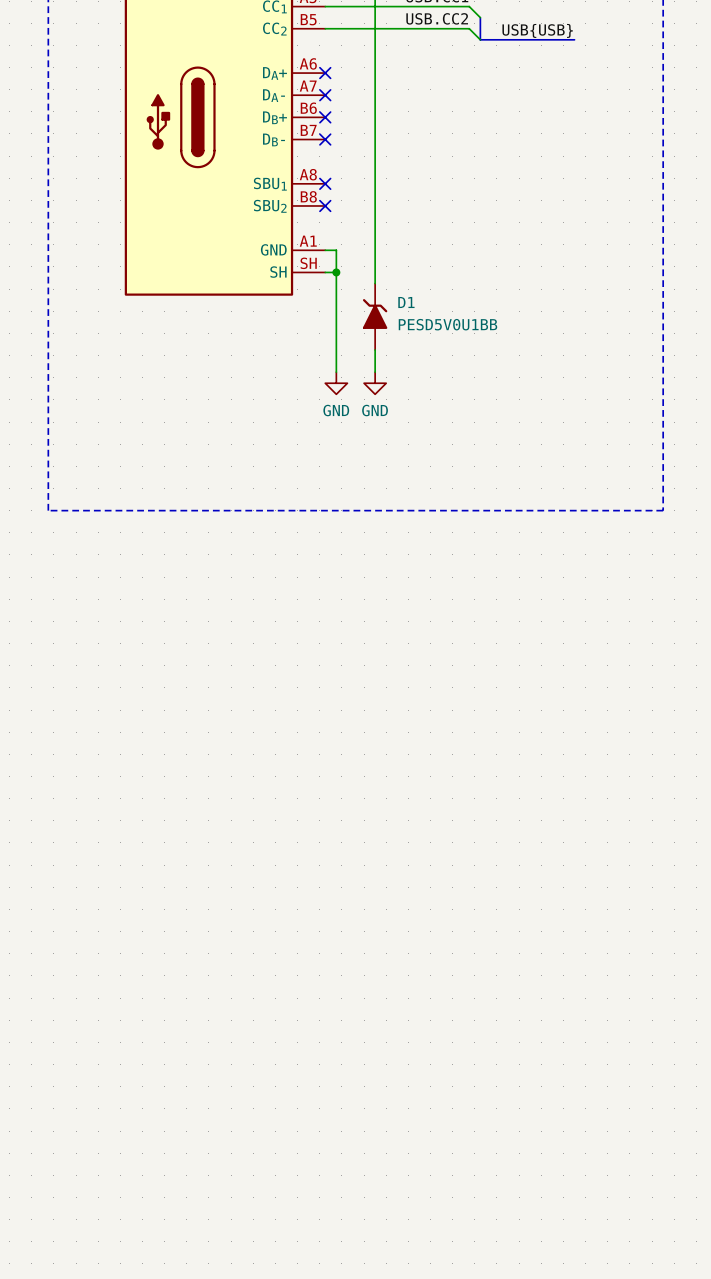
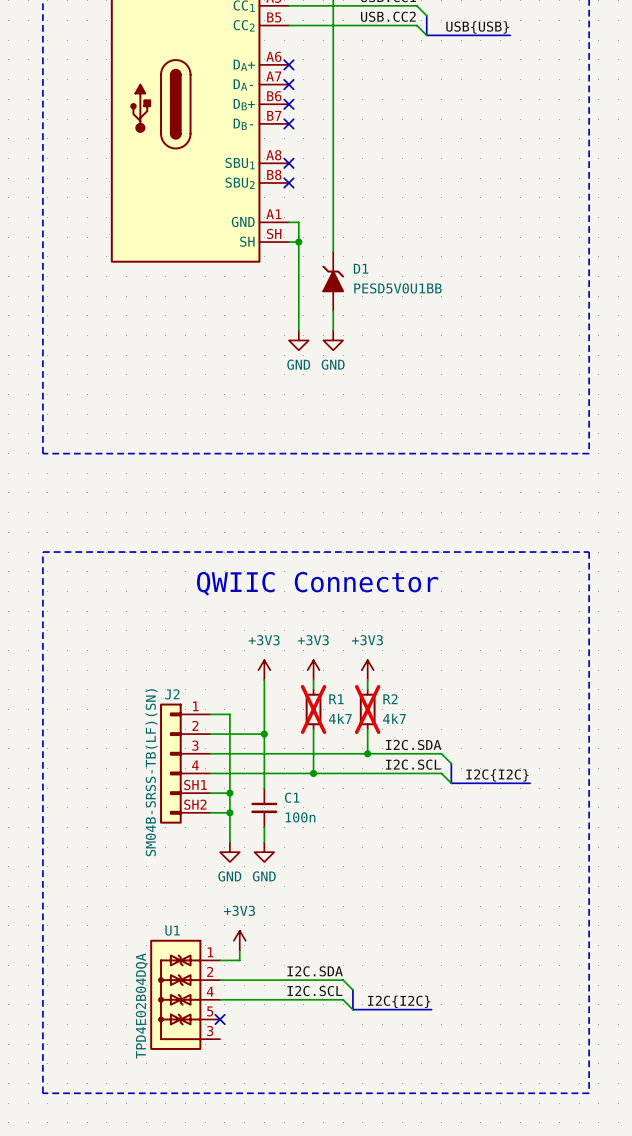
line: none -> (42, 552) (589, 552) (589, 1093) (42, 1093) (42, 552)
text: none -> QWIIC Connector (317, 583)
power symbol: none -> +3V3 (264, 670)
power symbol: none -> +3V3 (313, 670)
power symbol: none -> +3V3 (367, 670)
wire: none -> (264, 679) (264, 788)
wire: none -> (313, 679) (313, 689)
wire: none -> (367, 679) (367, 689)
R1: none -> (313, 709)
R2: none -> (367, 709)
wire: none -> (210, 714) (229, 714) (229, 842)
wire: none -> (313, 729) (313, 773)
wire: none -> (367, 729) (367, 753)
wire: none -> (210, 734) (264, 734)
junction: none -> (264, 734)
label: none -> I2C.SDA (413, 744)
wire: none -> (210, 753) (441, 753) (451, 763)
junction: none -> (367, 753)
J2: none -> (185, 763)
bus: none -> (451, 763) (451, 783) (530, 783)
label: none -> I2C.SCL (413, 764)
wire: none -> (210, 773) (441, 773) (451, 783)
junction: none -> (313, 773)
label: none -> I2C{I2C} (497, 775)
wire: none -> (210, 793) (229, 793)
junction: none -> (229, 793)
C1: none -> (264, 807)
wire: none -> (210, 812) (229, 812)
junction: none -> (229, 812)
wire: none -> (264, 827) (264, 842)
power symbol: none -> GND (229, 852)
power symbol: none -> GND (264, 852)
power symbol: none -> +3V3 (239, 940)
wire: none -> (239, 950) (239, 960) (220, 960)
label: none -> I2C.SDA (315, 971)
wire: none -> (220, 980) (343, 980) (352, 989)
bus: none -> (352, 989) (352, 1009) (431, 1009)
label: none -> I2C.SCL (314, 991)
U1: none -> TPD4E02B04DQA (185, 994)
wire: none -> (220, 999) (343, 999) (352, 1009)
label: none -> I2C{I2C} (399, 1001)
no-connect mark: none -> (220, 1019)

